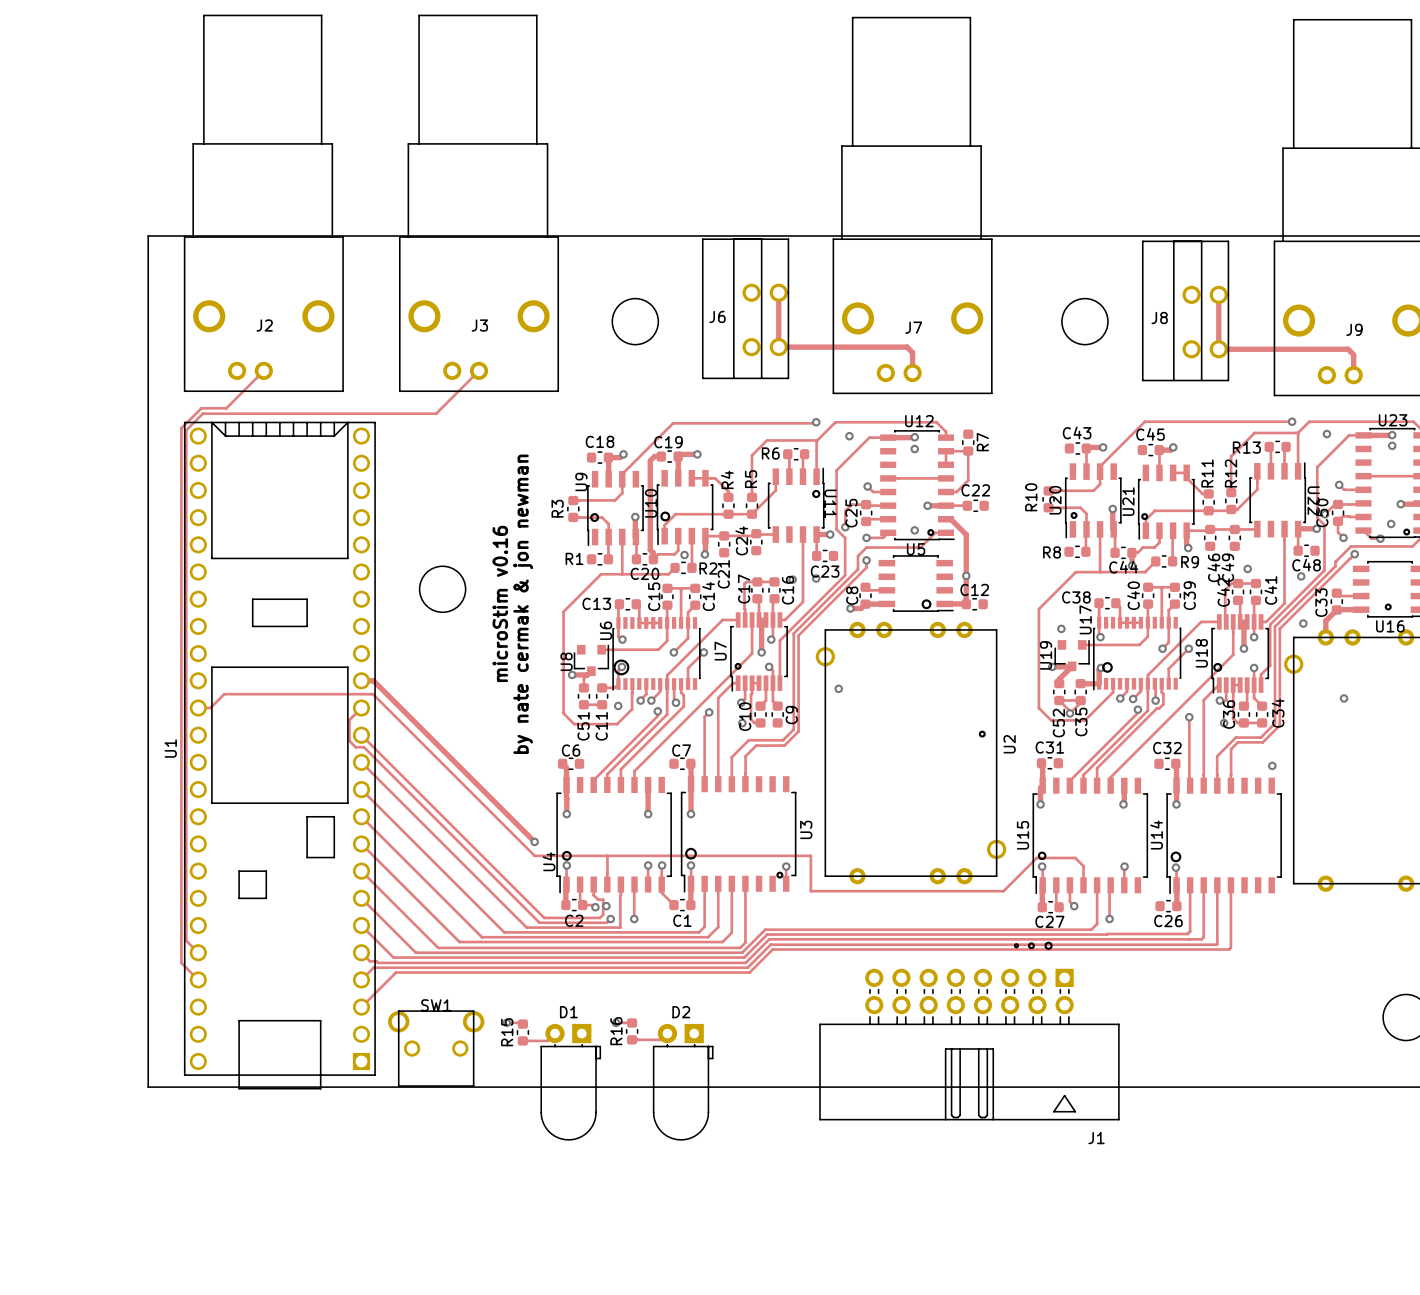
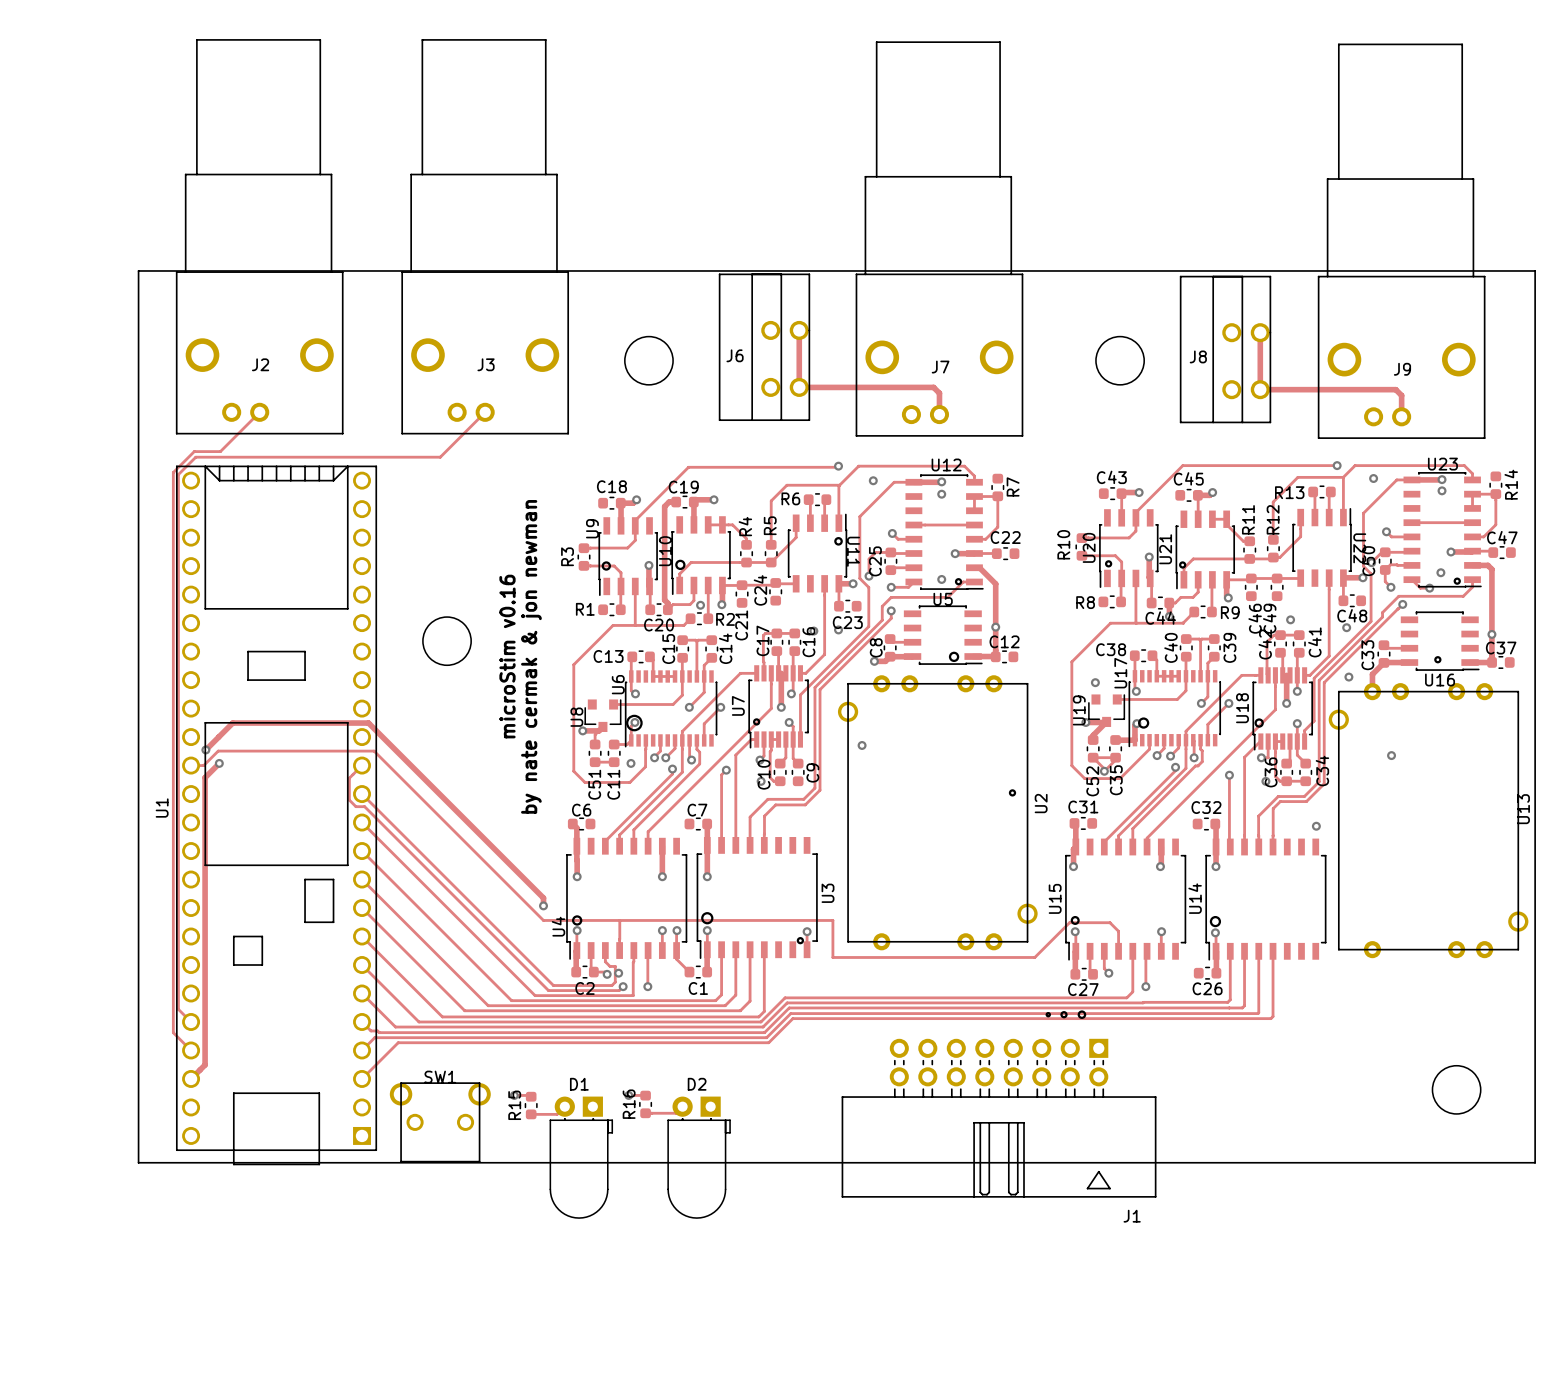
track: (361, 680) (373, 680) (534, 841) -> (205, 749) (232, 723) (368, 723) (543, 898) (543, 905)
via: none -> (205, 749)
track: none -> (219, 763) (205, 777) (205, 1064) (191, 1078)
via: none -> (219, 763)

